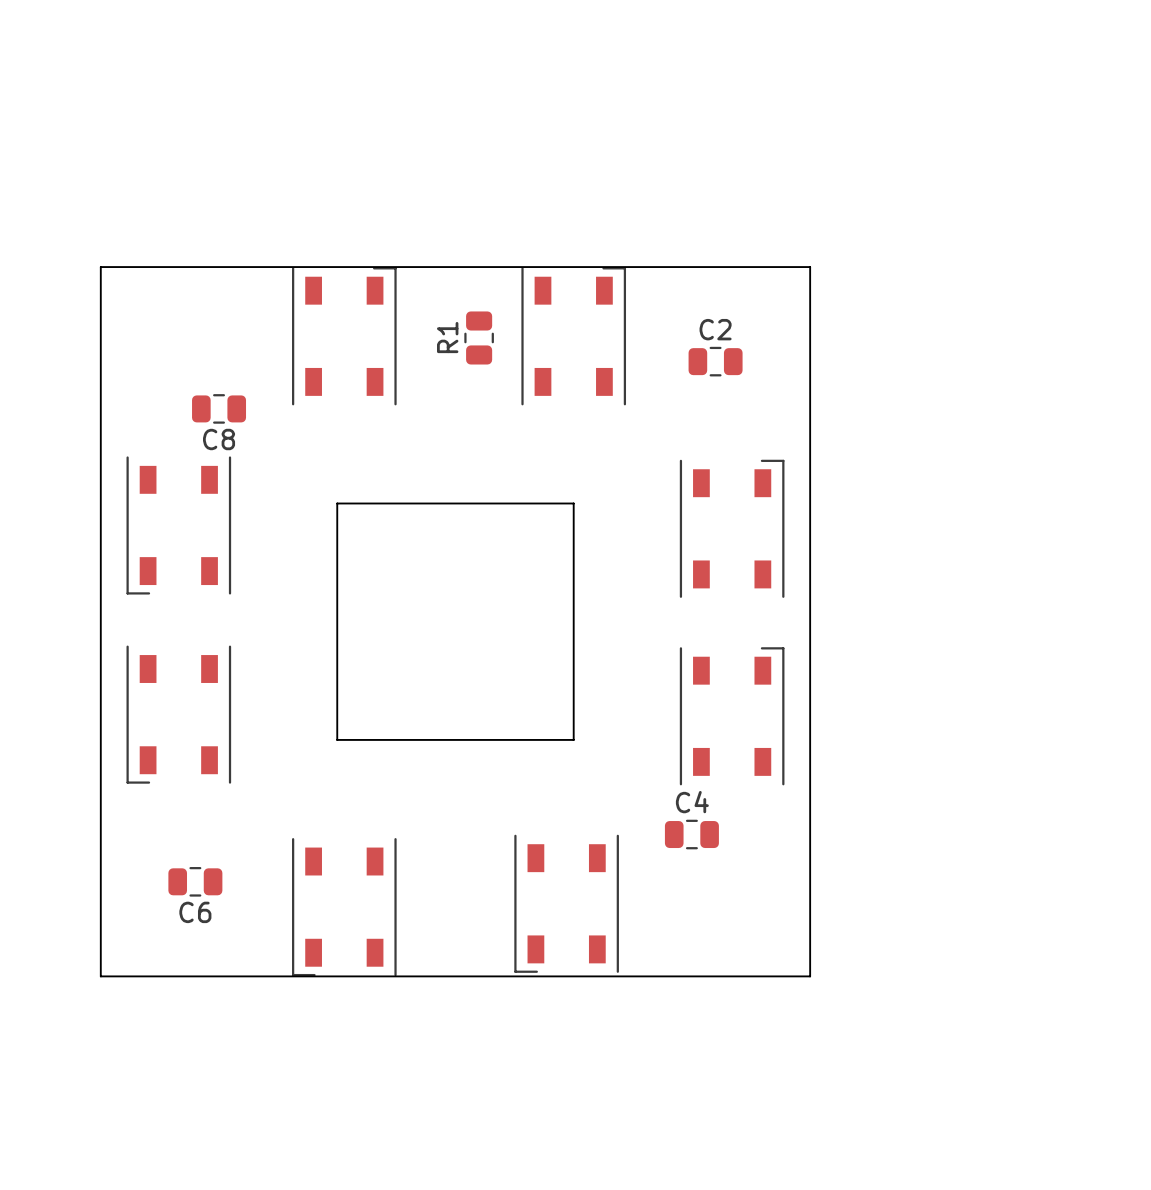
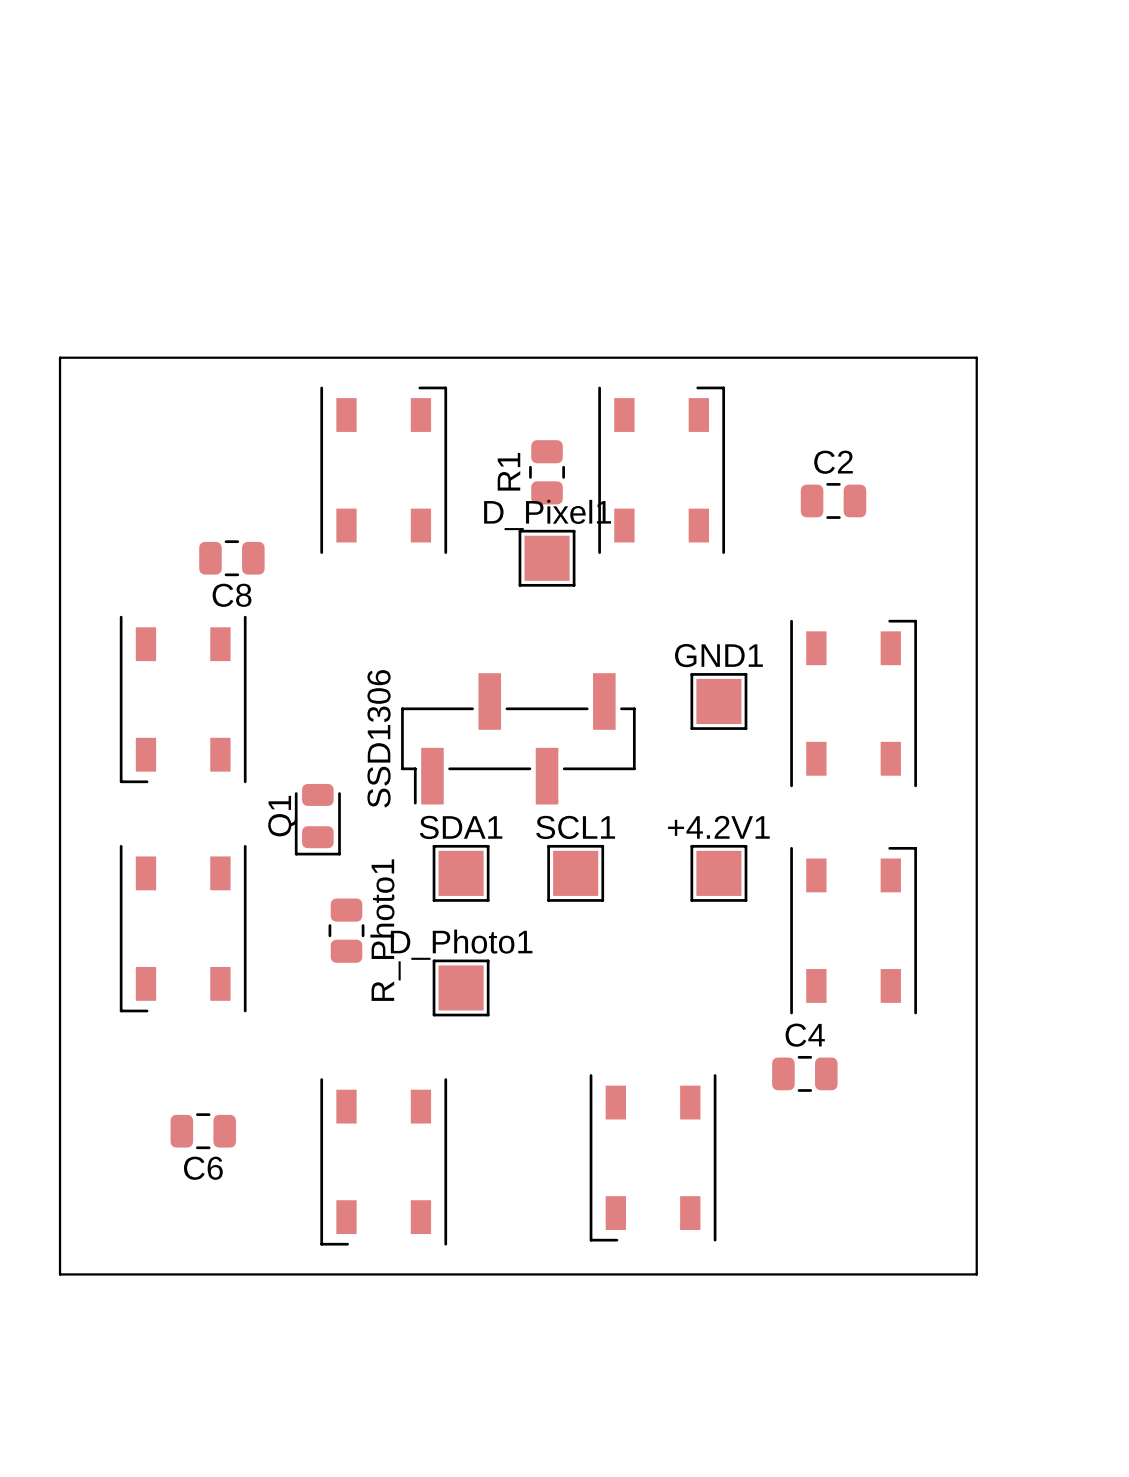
board edge: (100, 267) (810, 267) (810, 976) (100, 976) (100, 267) -> (60, 357) (60, 1274) (976, 1274) (976, 357) (60, 357)
D_Pixel1: none -> (547, 558)
board edge: (337, 503) (573, 503) (573, 739) (337, 739) (337, 503) -> none
GND1: none -> (718, 701)
SSD1306: none -> (518, 738)
Q1: none -> (317, 819)
SDA1: none -> (461, 873)
SCL1: none -> (575, 873)
+4.2V1: none -> (718, 873)
R_Photo1: none -> (346, 930)
D_Photo1: none -> (461, 987)

